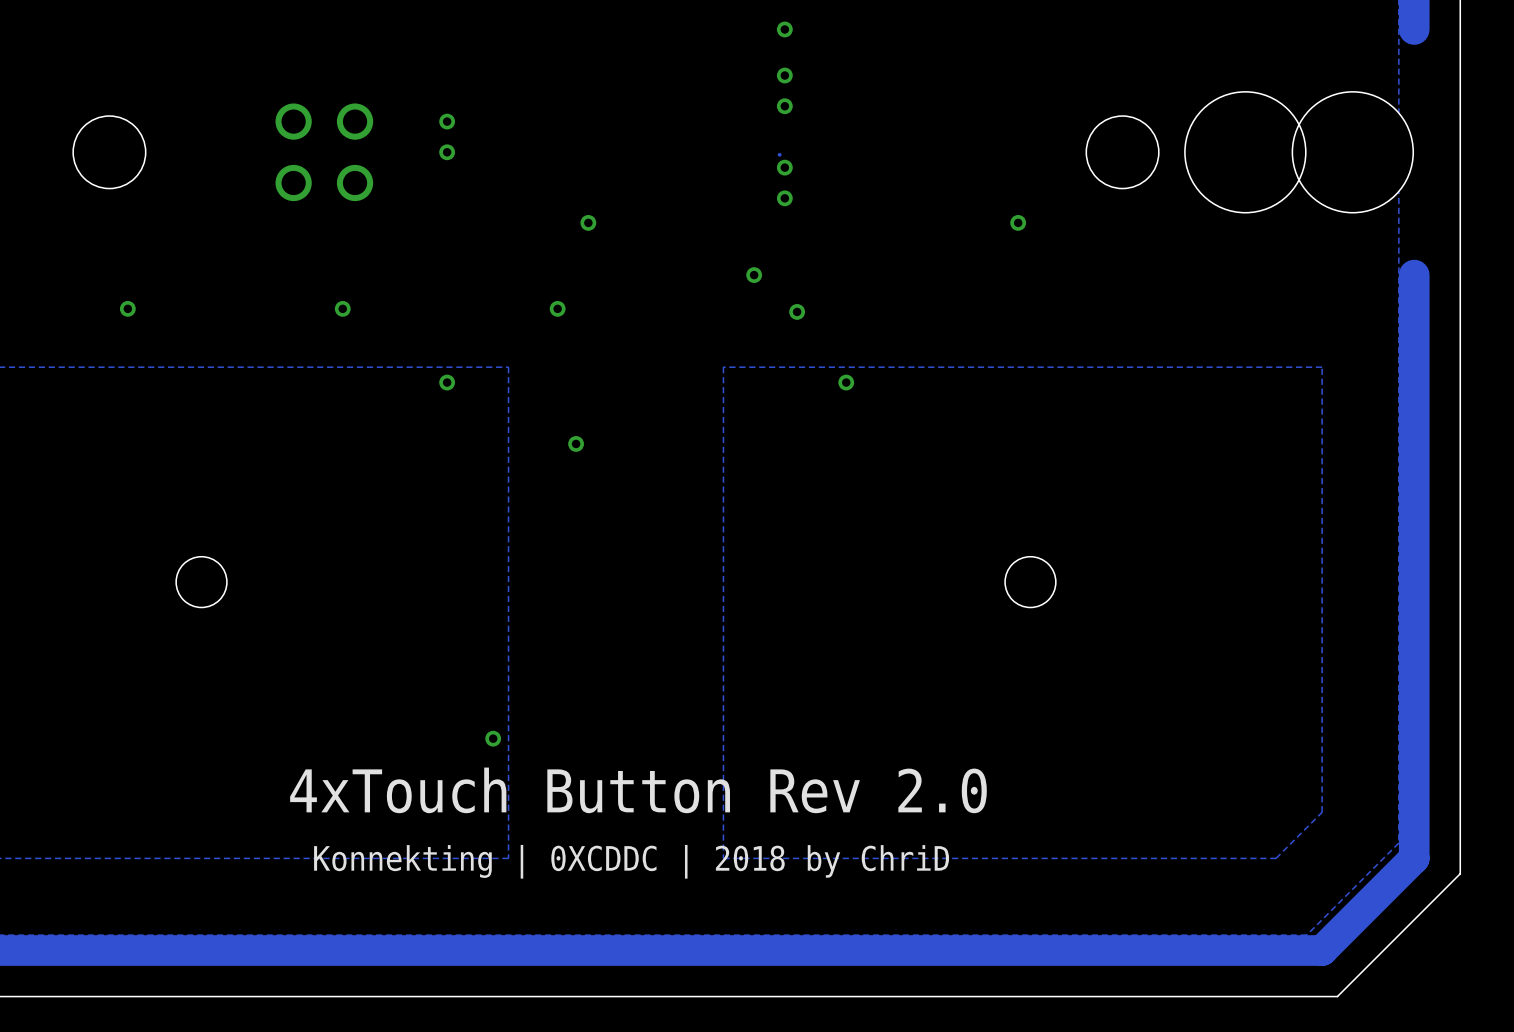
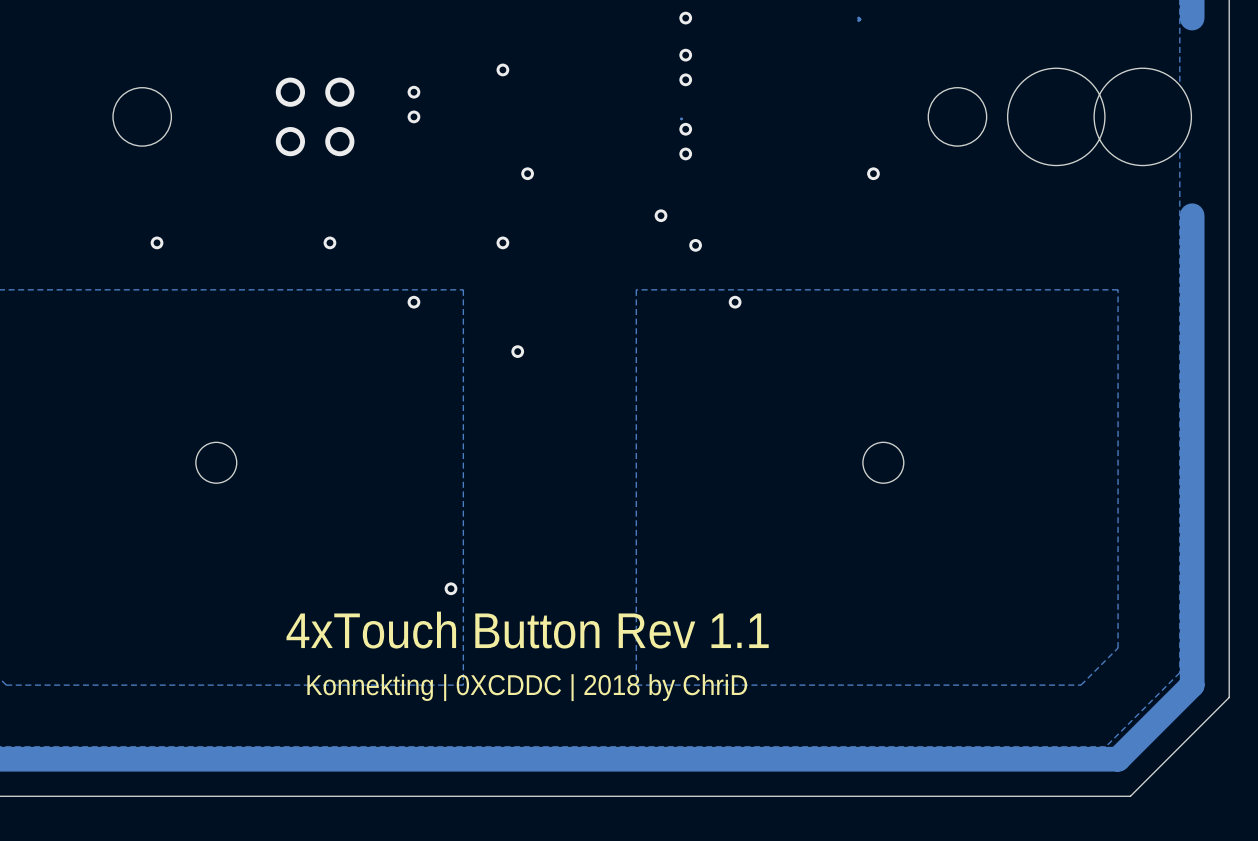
track: none -> (858, 18) (858, 20)
via: none -> (502, 69)
text: 4xTouch Button Rev 2.0 (638, 790) -> 4xTouch Button Rev 1.1 (527, 630)

